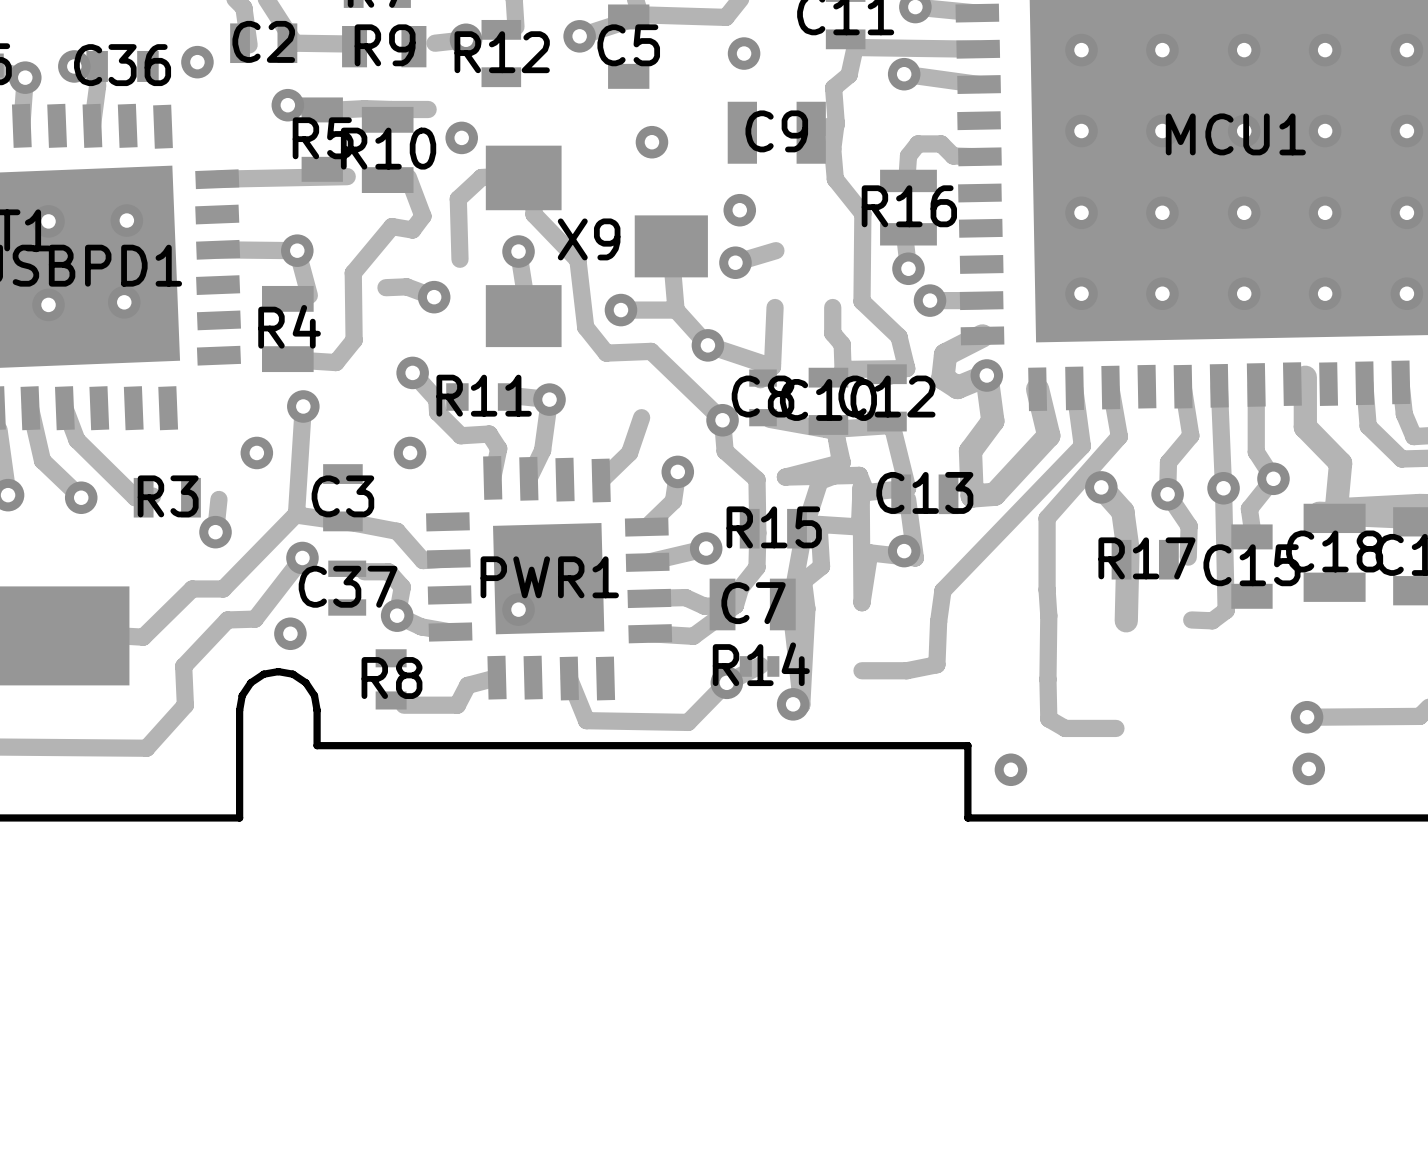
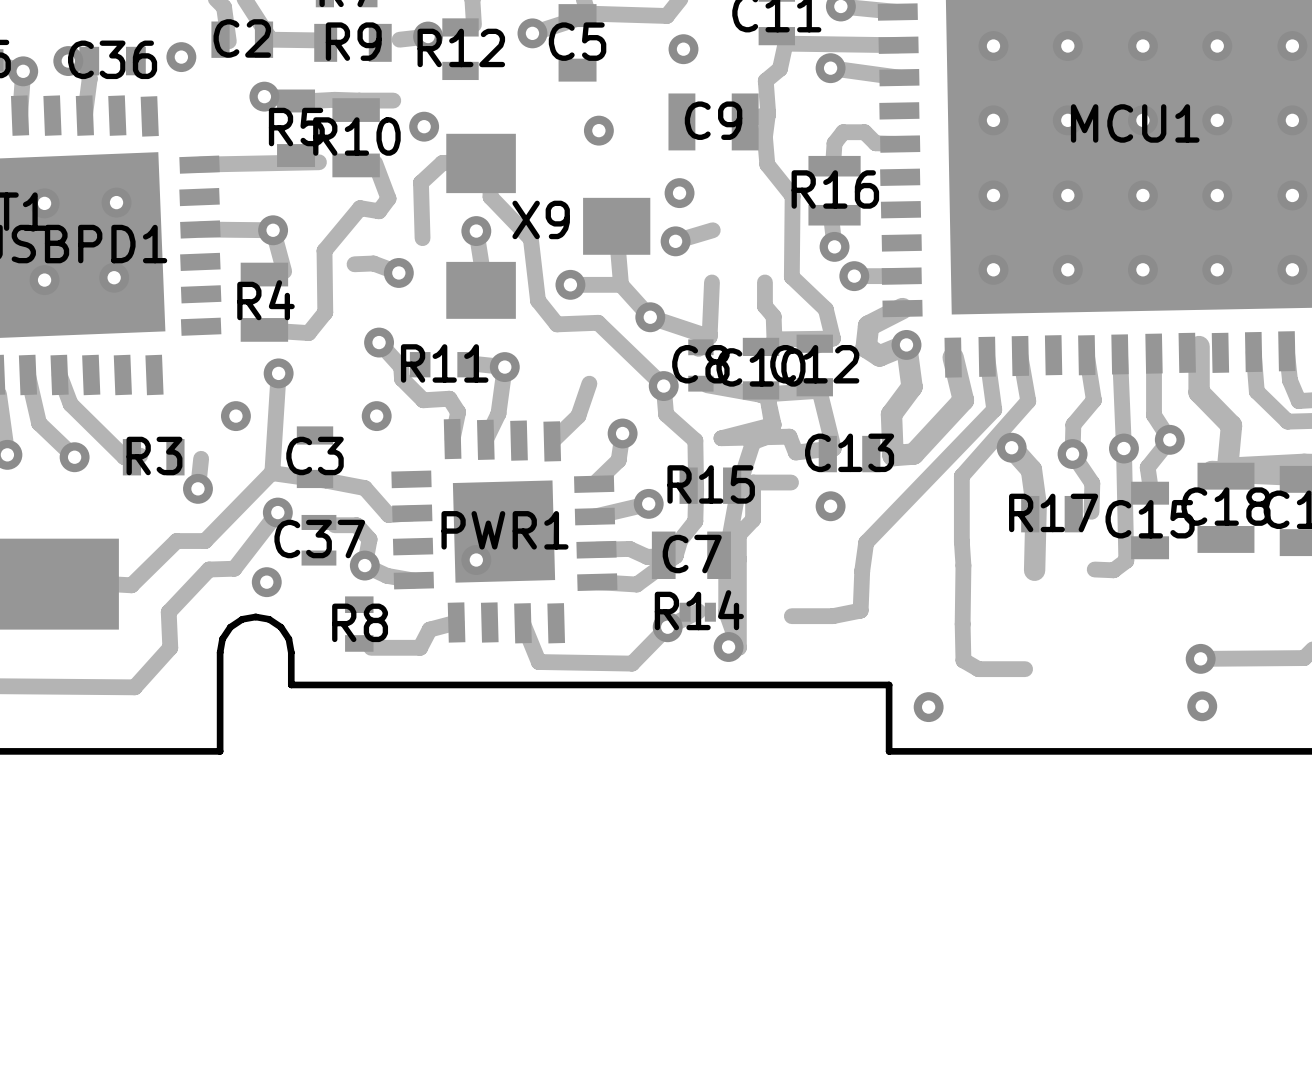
track: (907, 499) (915, 557) (869, 552) (862, 602) (861, 487) (859, 527) (818, 524) (821, 566) (803, 581) (806, 608) (801, 705) (790, 605) -> (791, 482) (753, 482) (753, 519) (738, 534) (738, 647) (726, 612) (726, 556)

